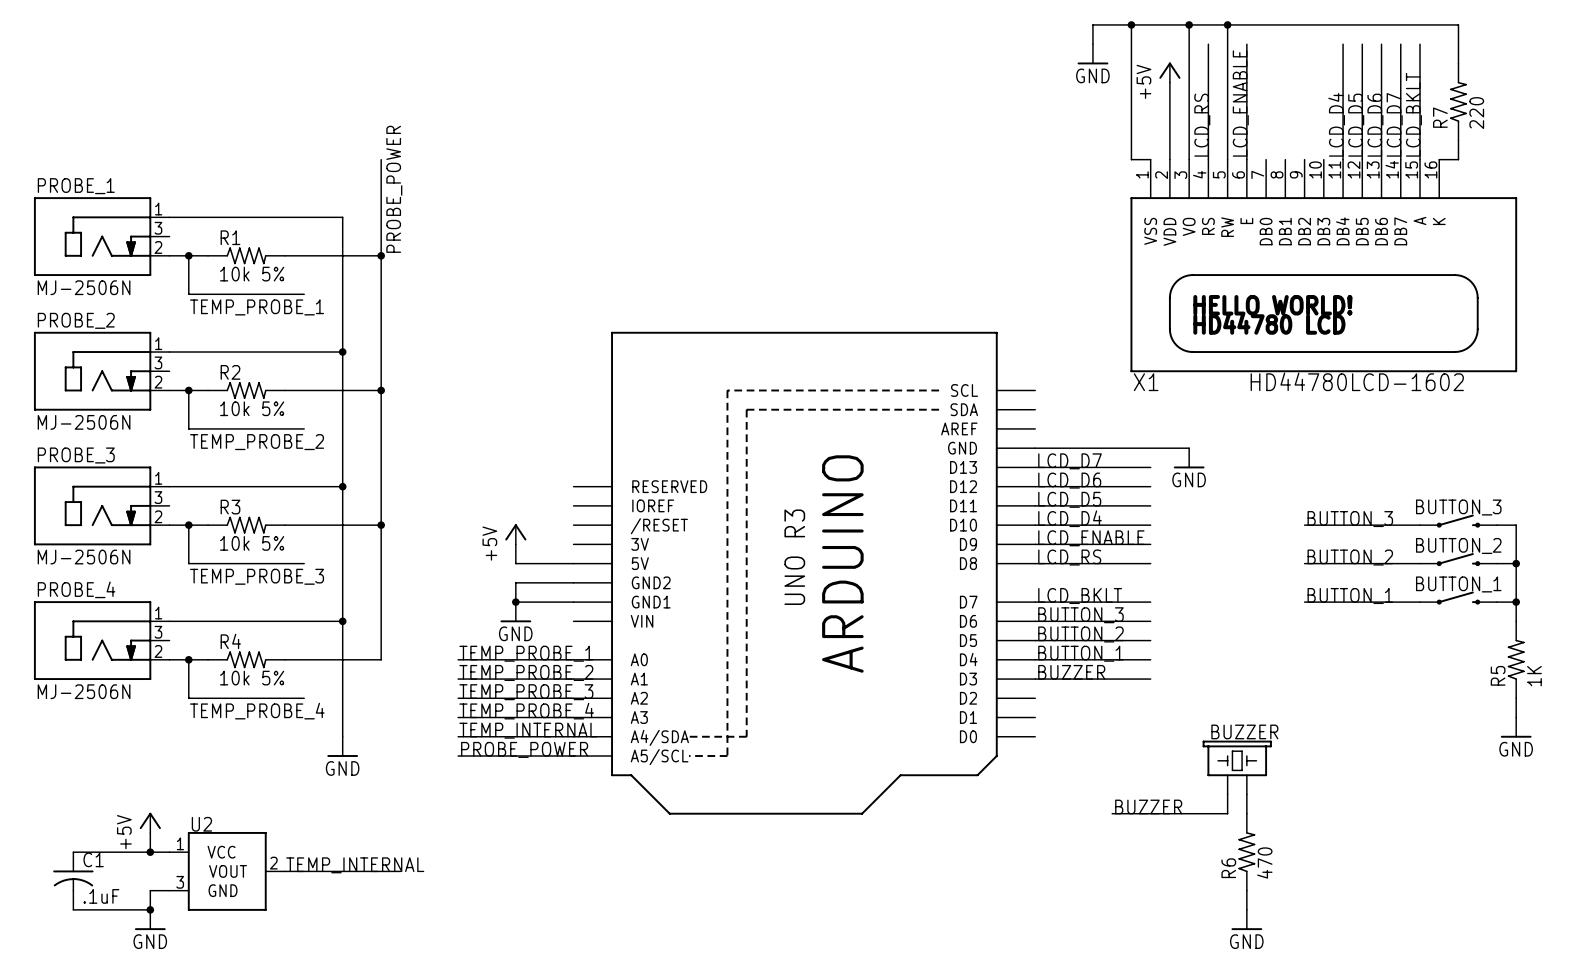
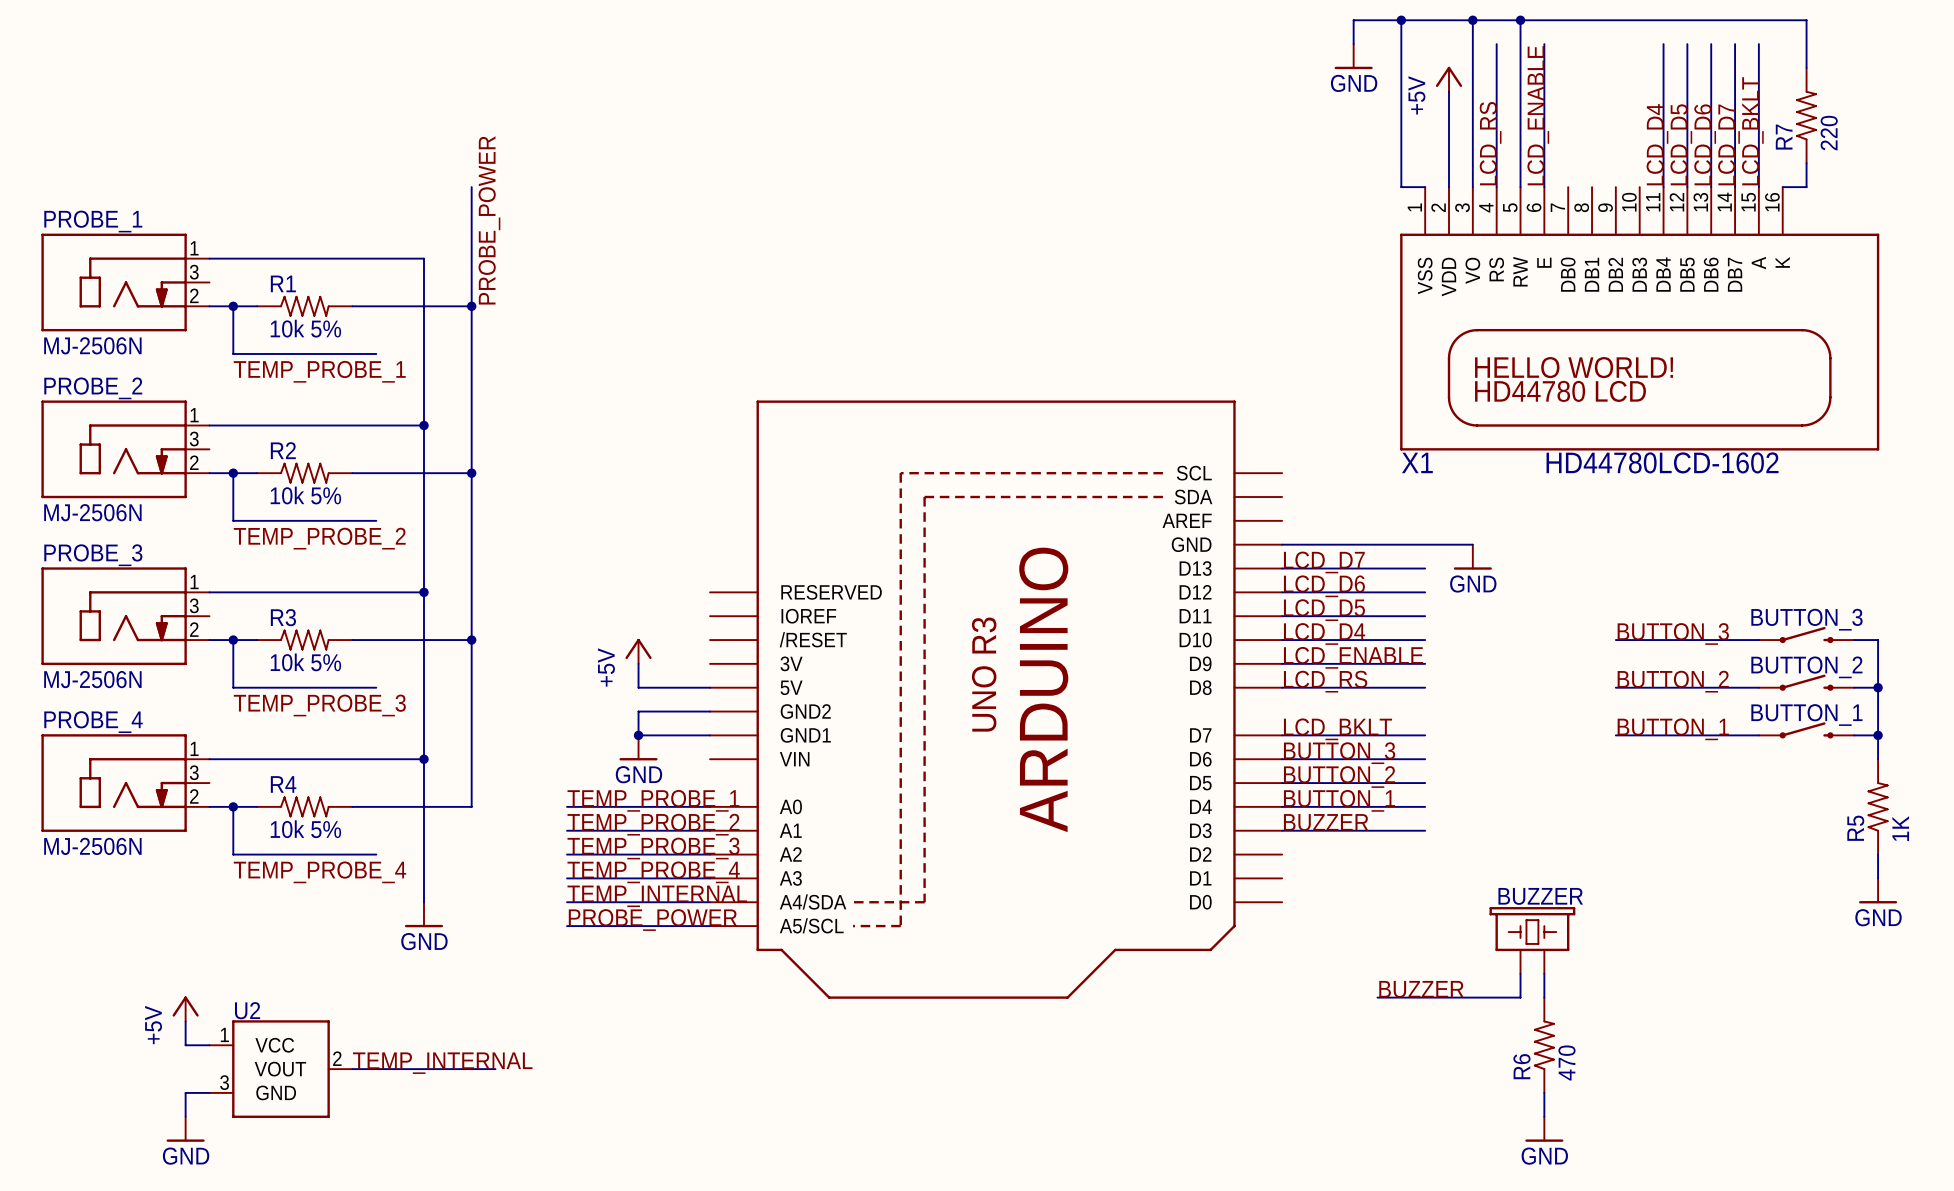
wire: (73, 852) (150, 852) -> none
junction: (150, 852) -> none
C1: .1uF (73, 881) -> none
wire: (73, 909) (150, 909) -> none
junction: (150, 909) -> none

